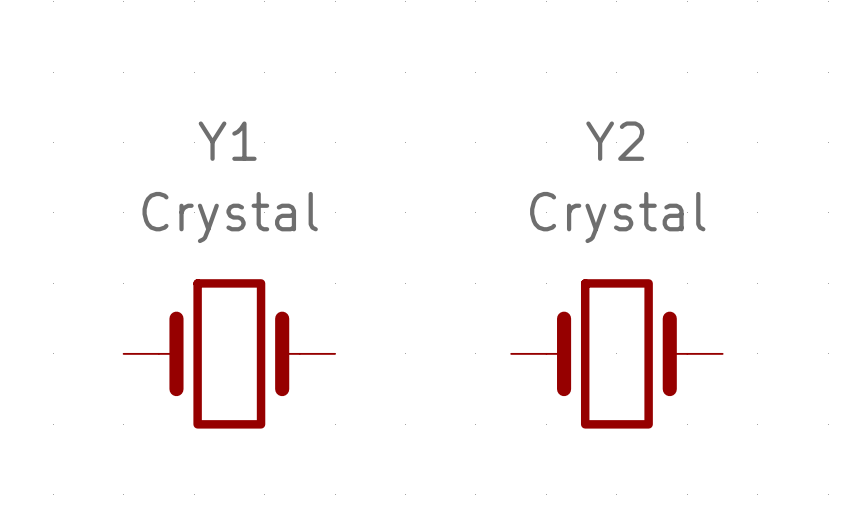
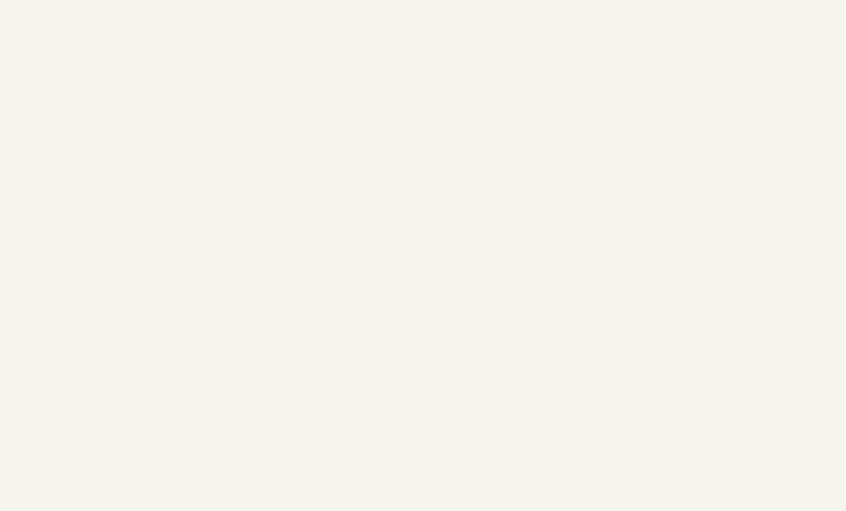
Y1: Crystal (229, 353) -> none
Y2: Crystal (616, 353) -> none

